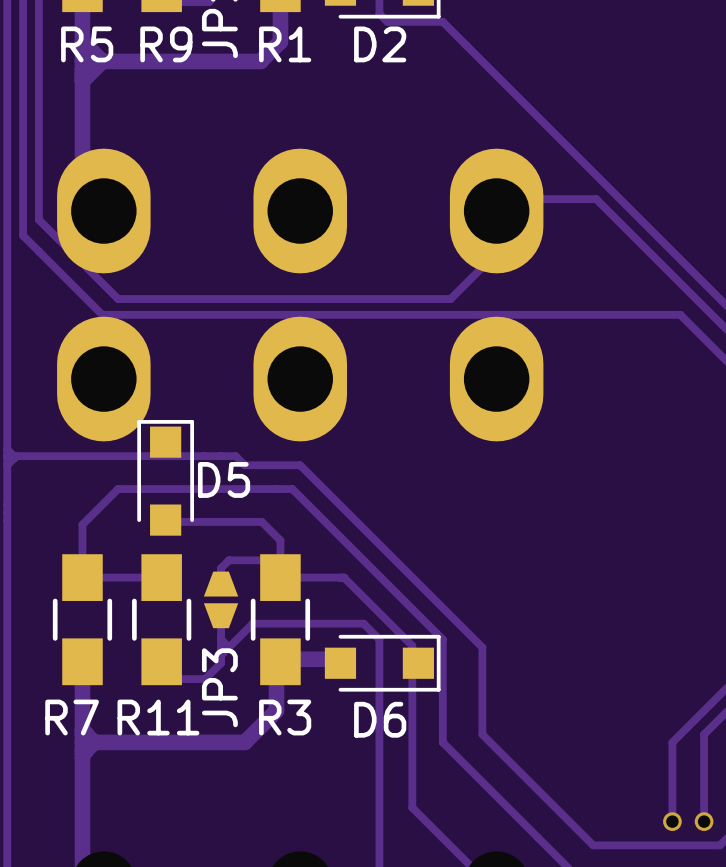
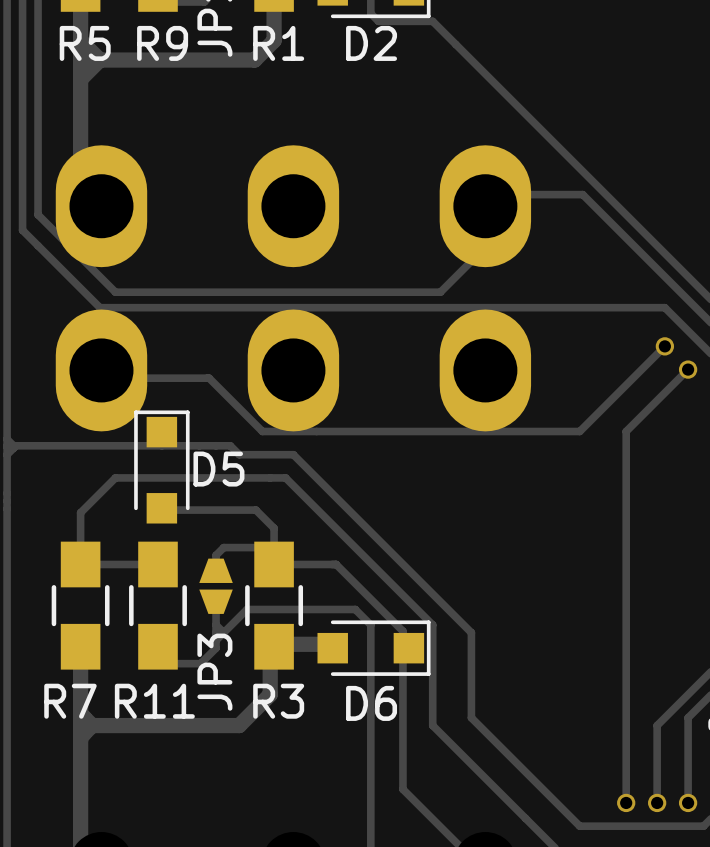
track: none -> (664, 346) (579, 431) (262, 431) (209, 378) (101, 378)
via: none -> (664, 346)
track: none -> (688, 369) (626, 431) (626, 802)
via: none -> (688, 369)
via: none -> (626, 802)

